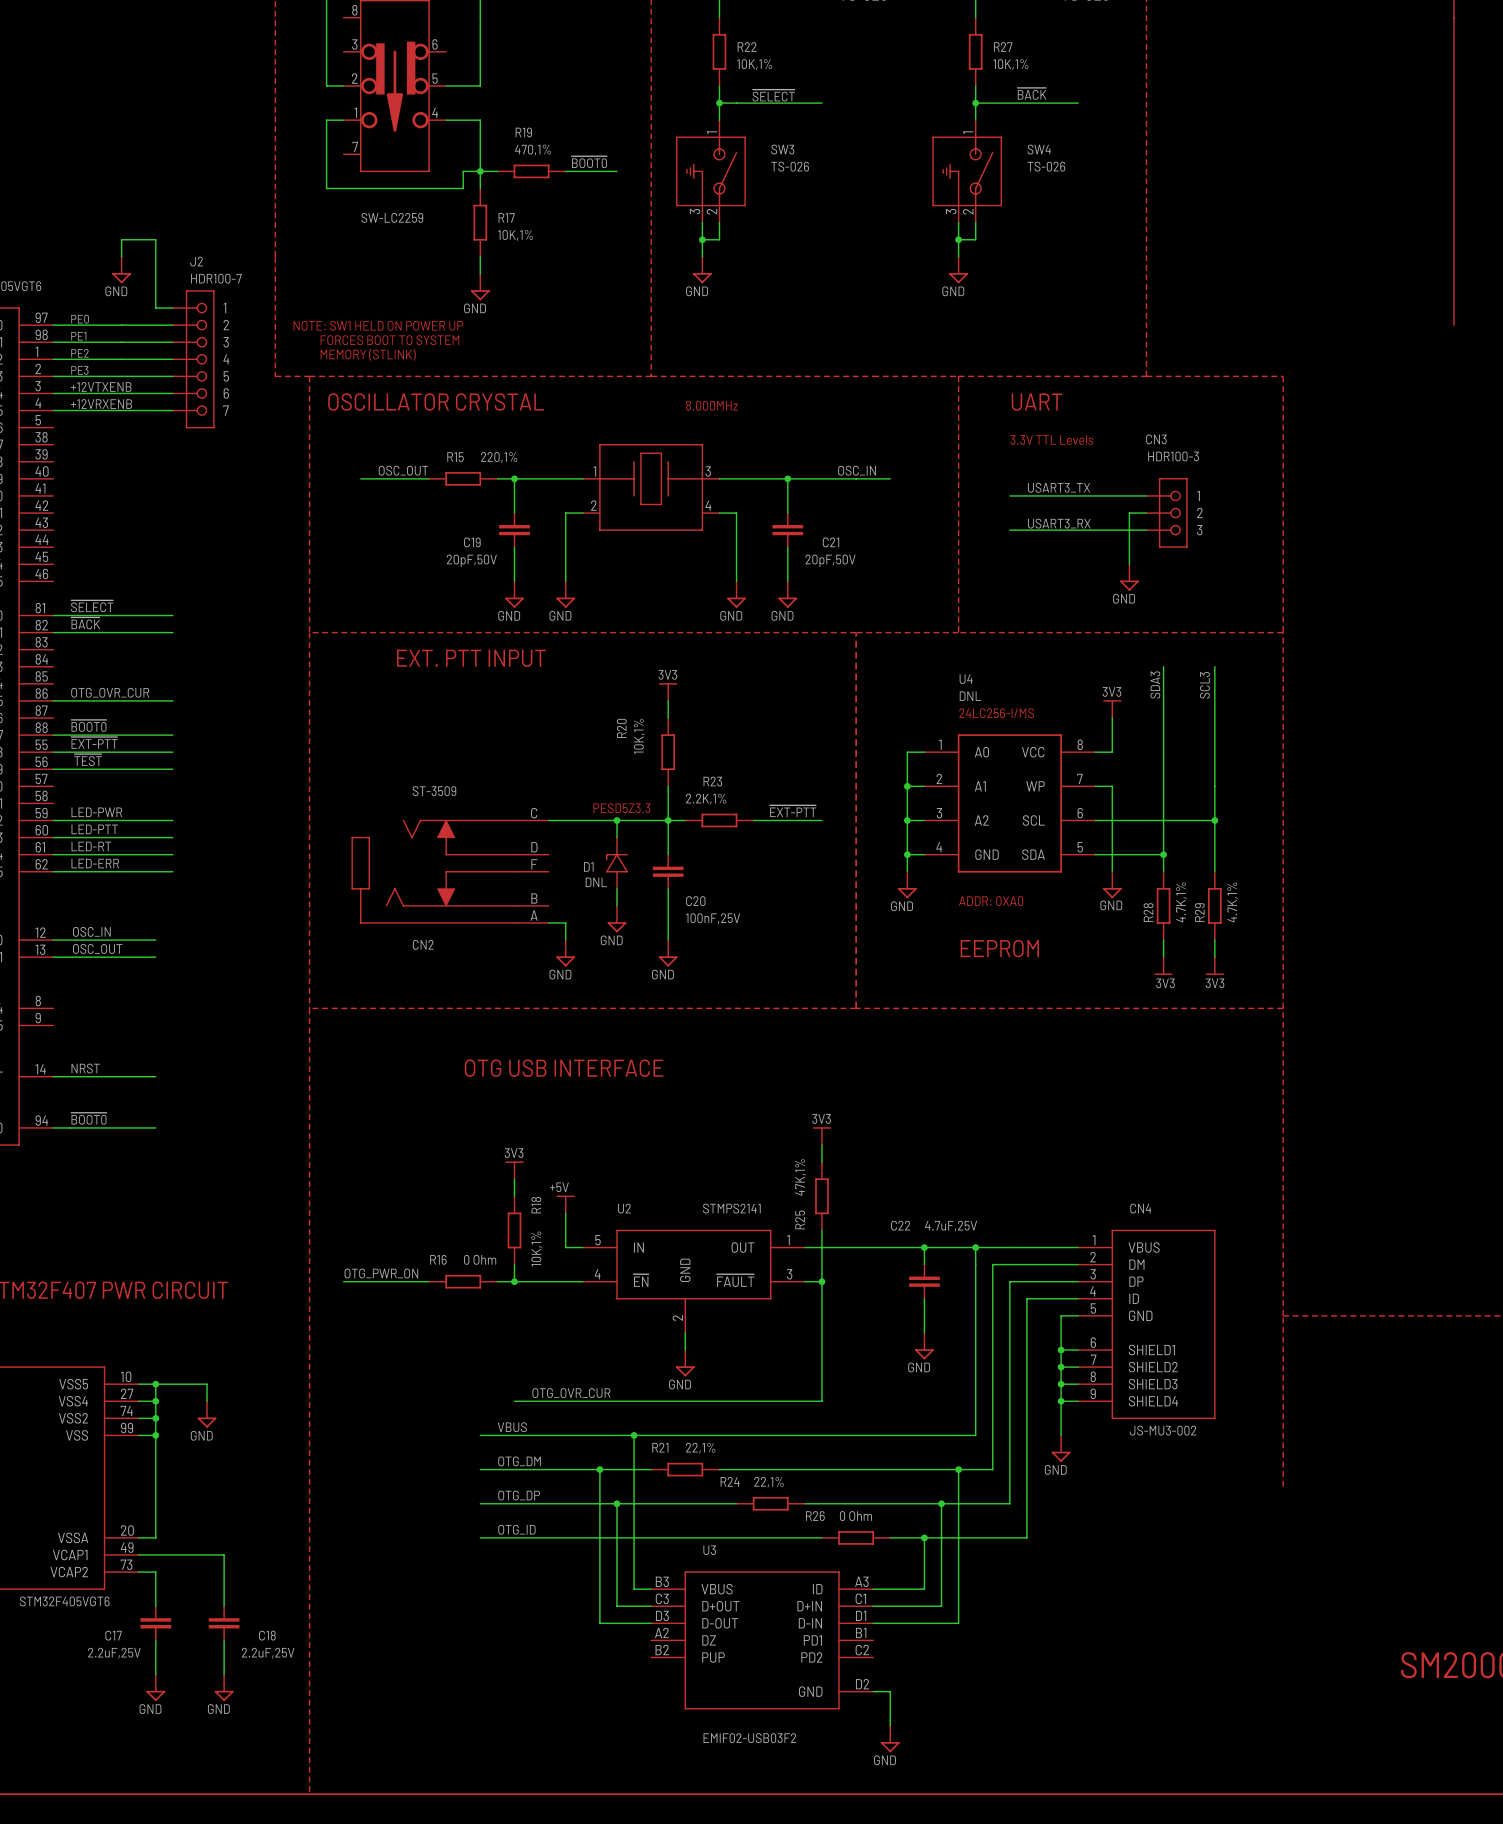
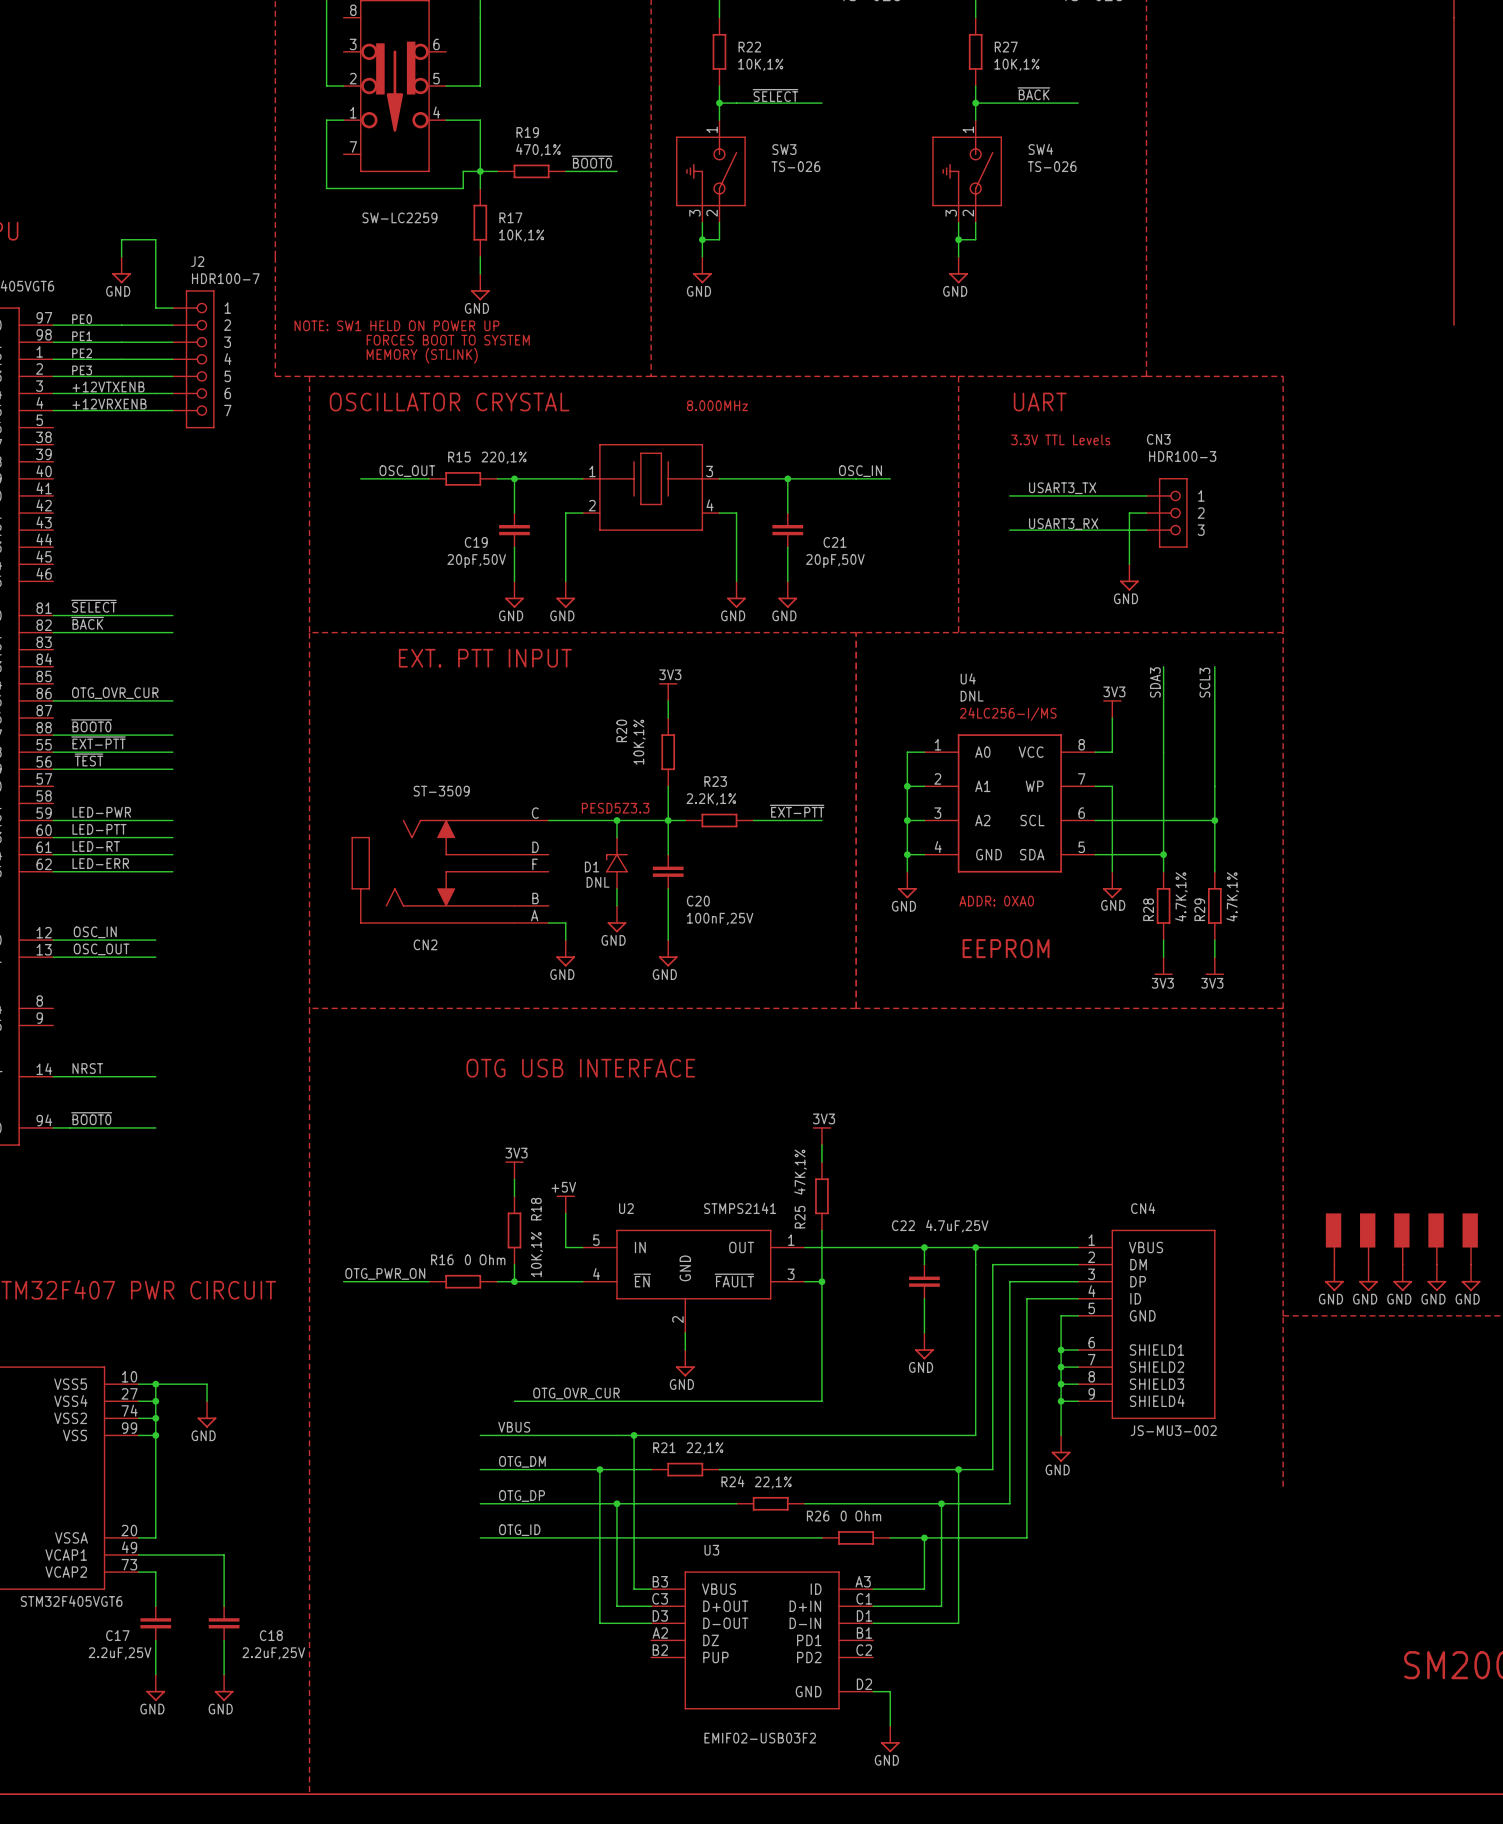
part: none -> (1333, 1238)
part: none -> (1367, 1238)
part: none -> (1401, 1238)
part: none -> (1436, 1238)
part: none -> (1470, 1238)
power symbol: none -> GND (1334, 1277)
power symbol: none -> GND (1368, 1277)
power symbol: none -> GND (1402, 1277)
power symbol: none -> GND (1436, 1277)
power symbol: none -> GND (1471, 1277)

